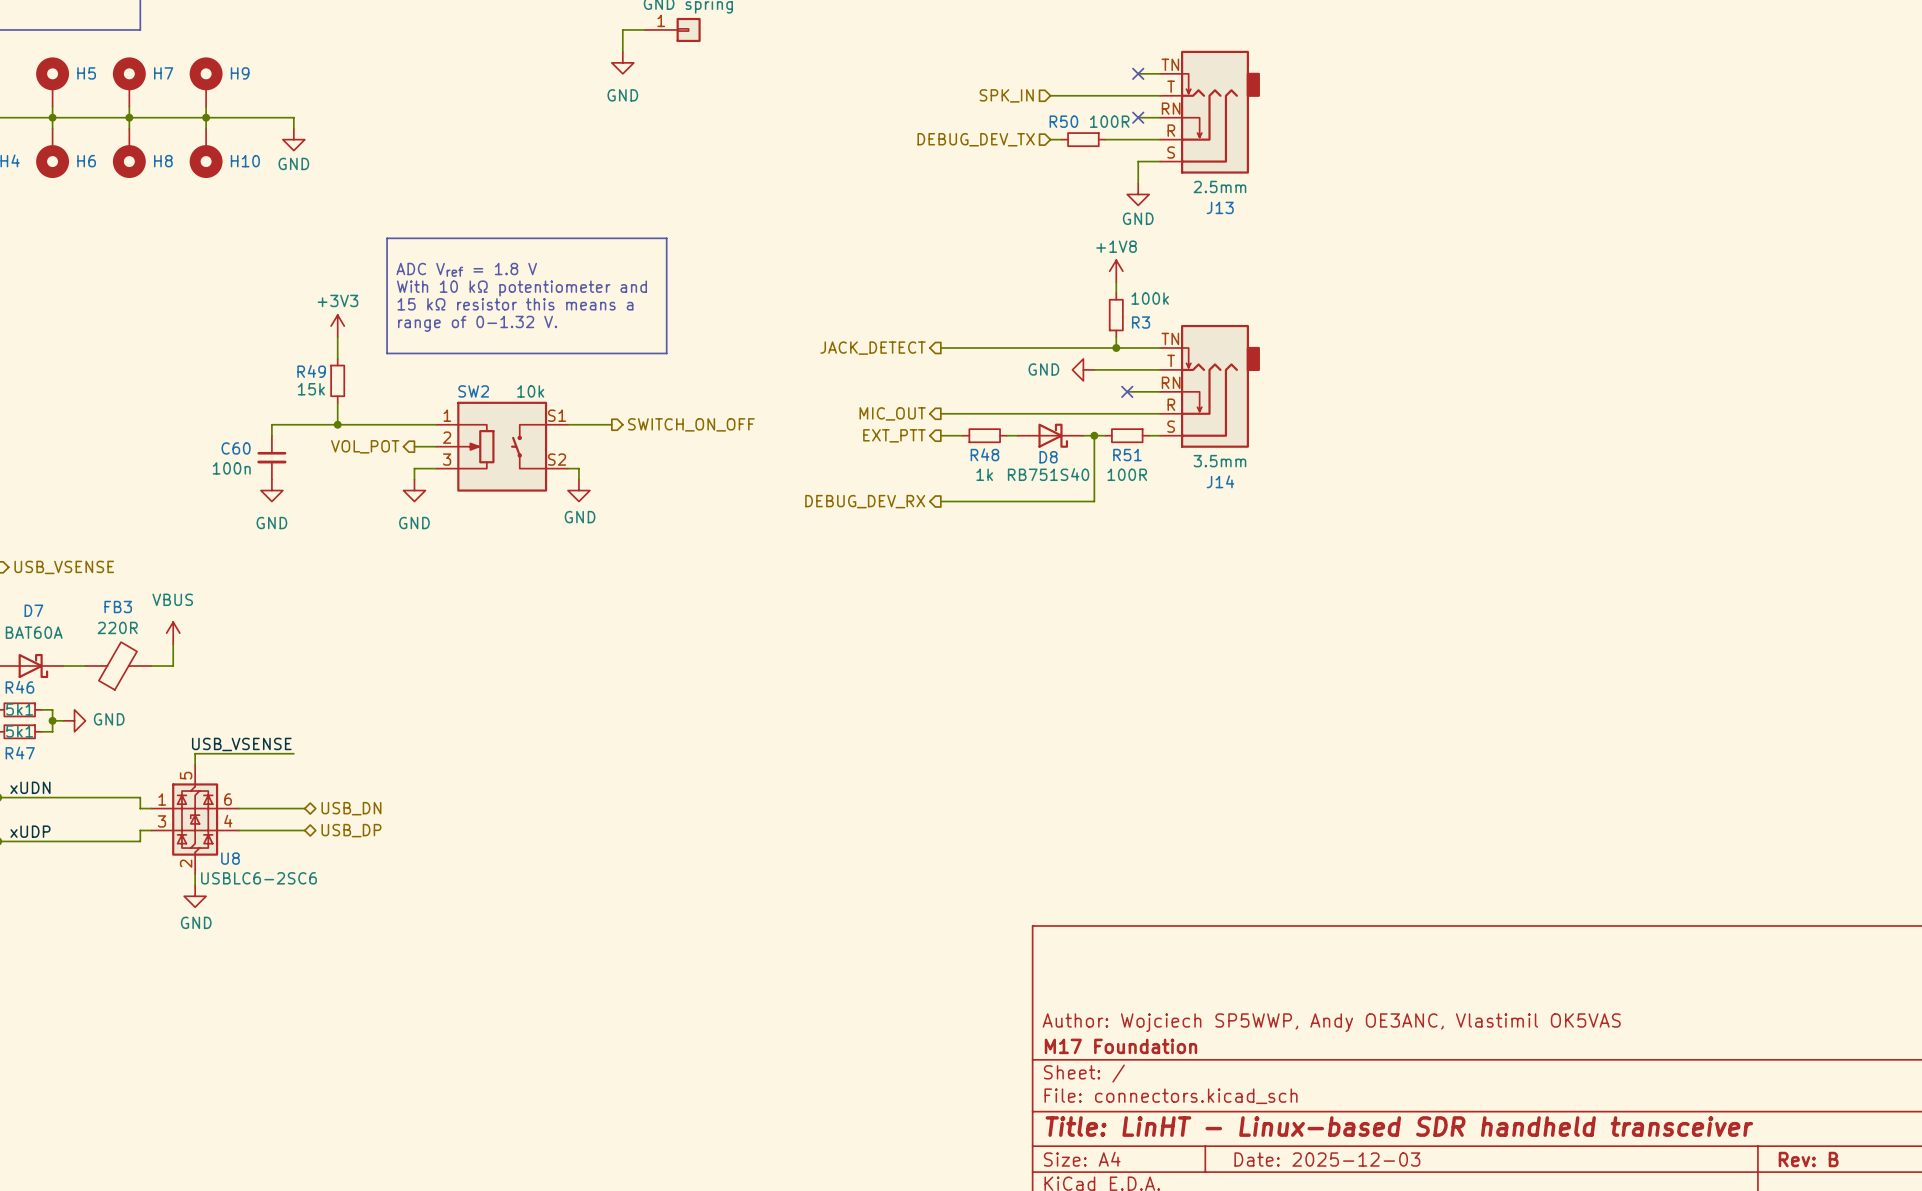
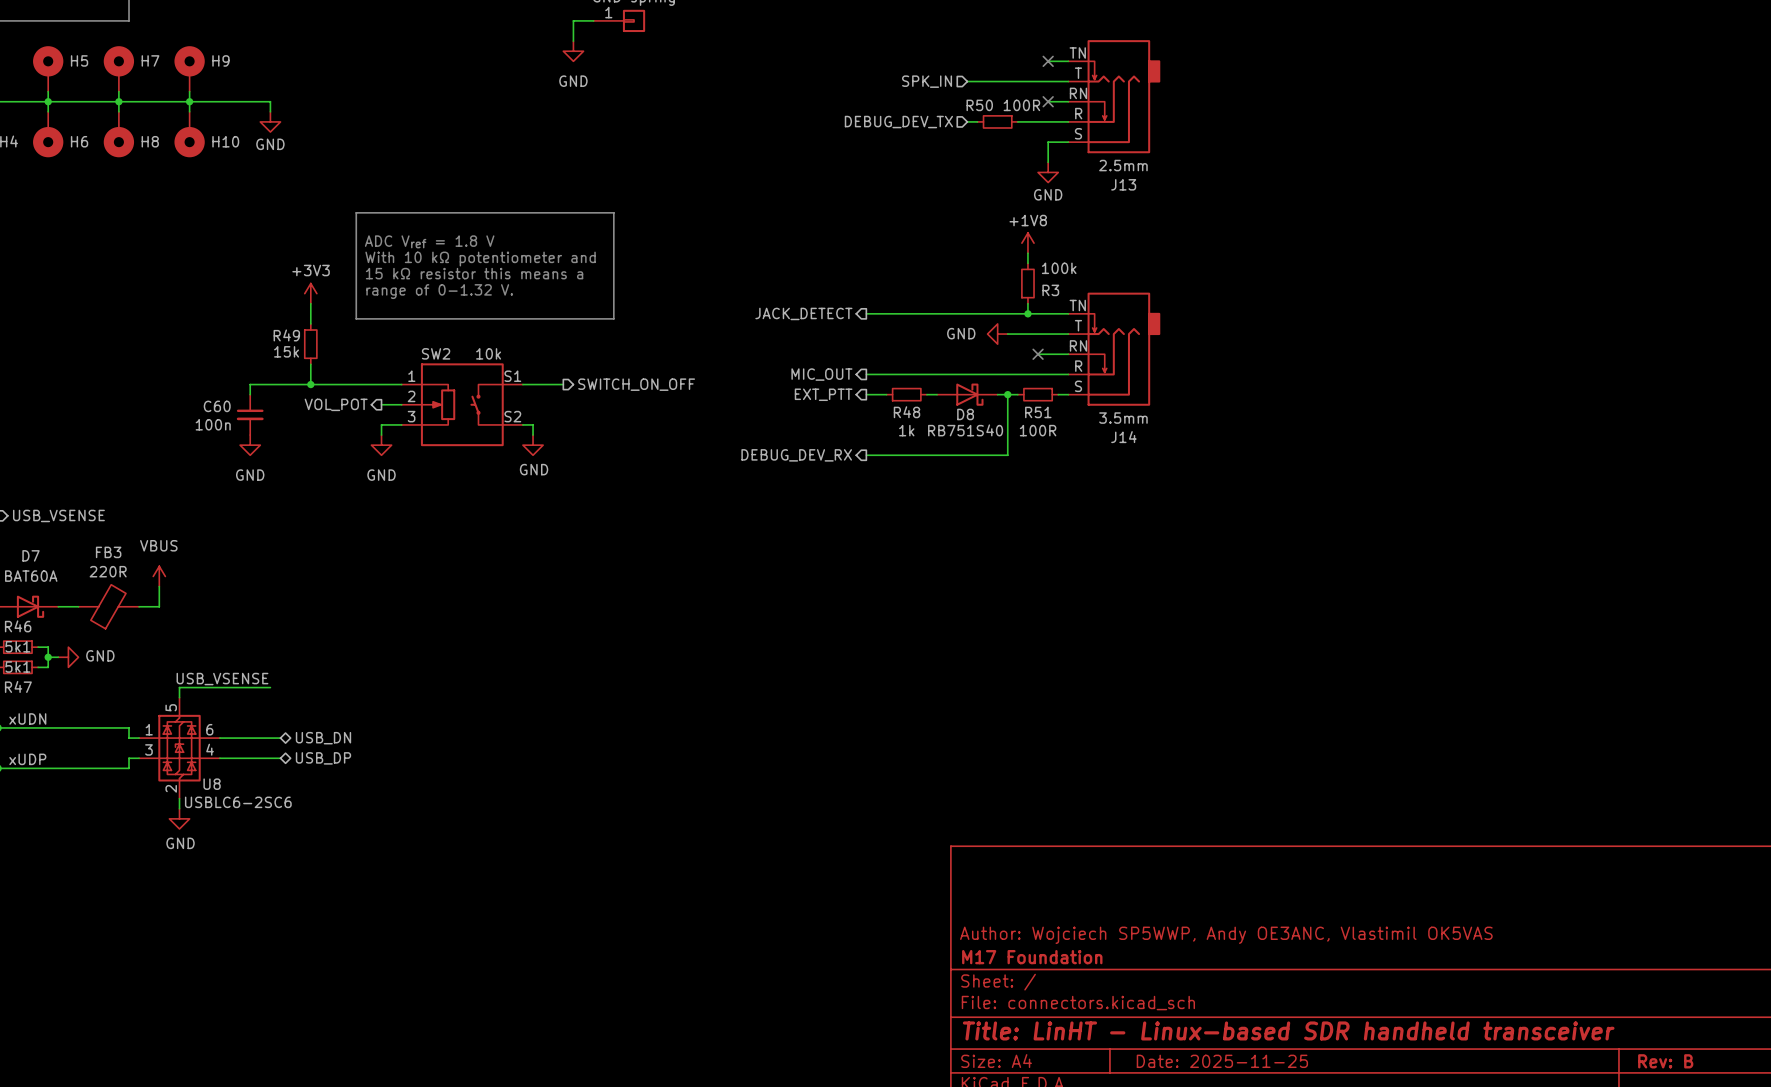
title block: Date: 2025-12-03 (1327, 1159) -> Date: 2025-11-25 (1222, 1061)

